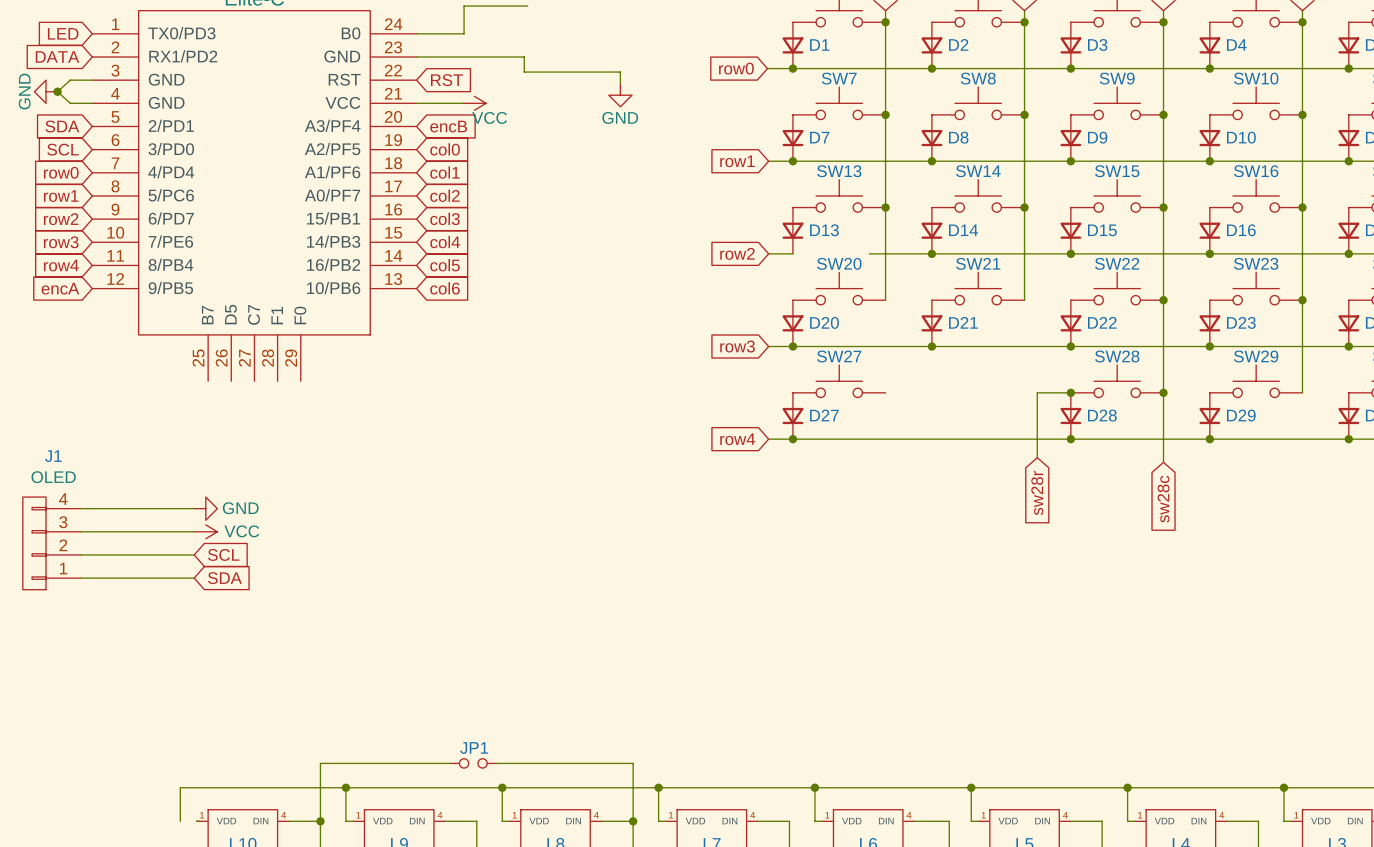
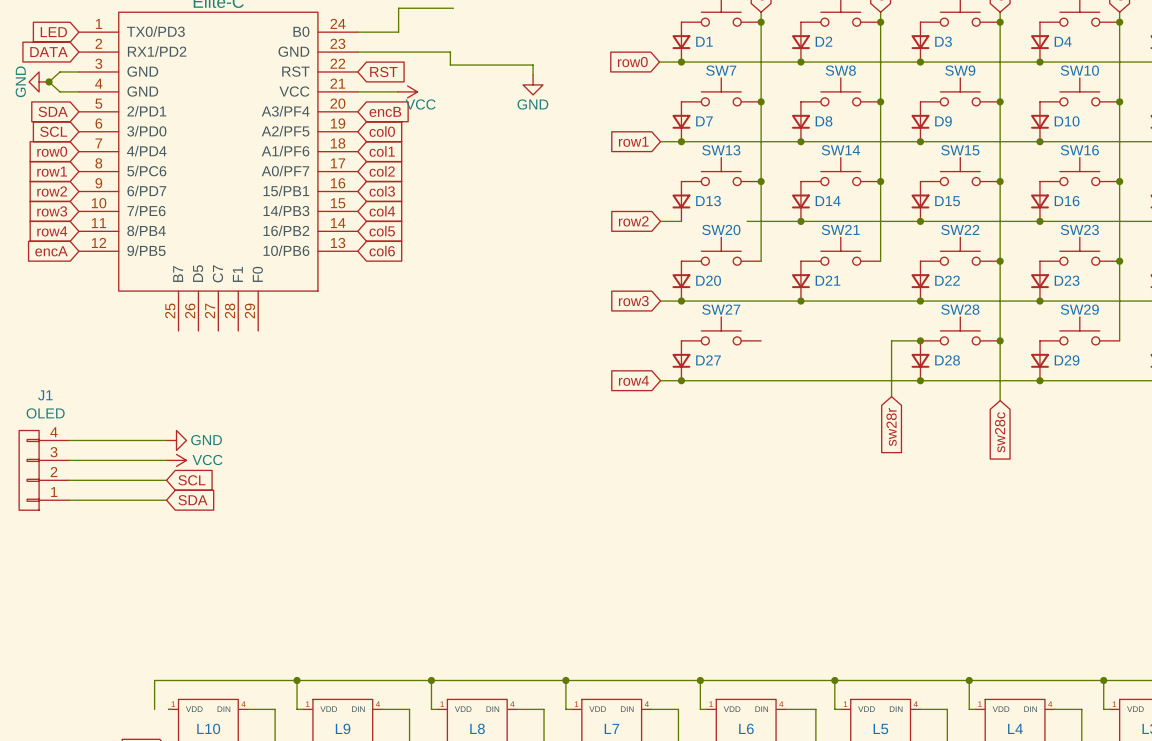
wire: (450, 763) (320, 763) (320, 821) -> none
JP1: (473, 763) -> none
wire: (496, 763) (633, 763) (633, 821) -> none
junction: (320, 821) -> none
junction: (633, 821) -> none

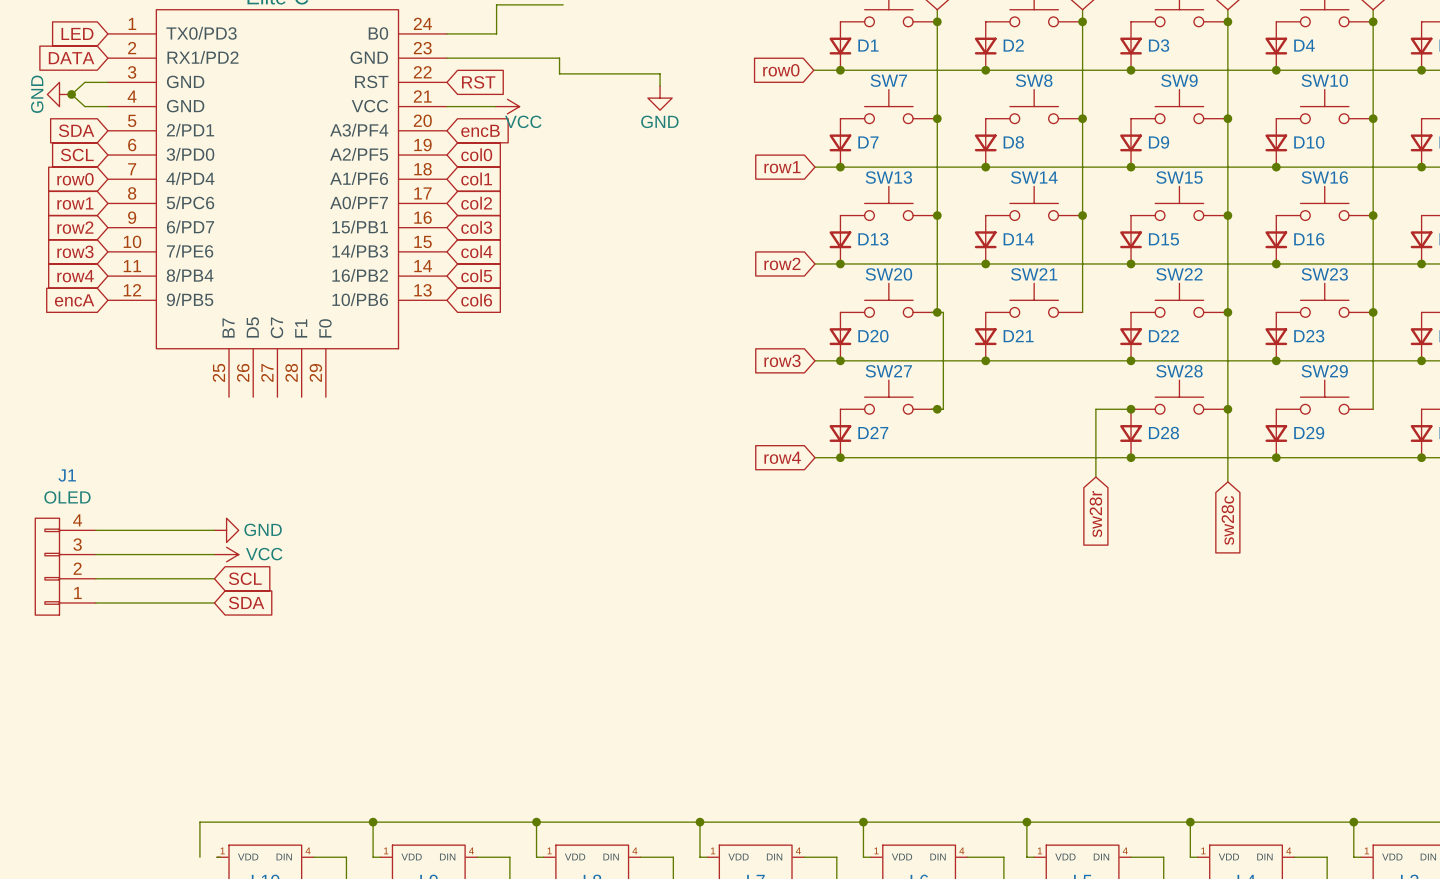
wire: none -> (840, 263) (920, 263)
junction: none -> (840, 263)
wire: none -> (931, 312) (943, 312) (943, 409) (931, 409)
junction: none -> (937, 312)
junction: none -> (937, 409)

